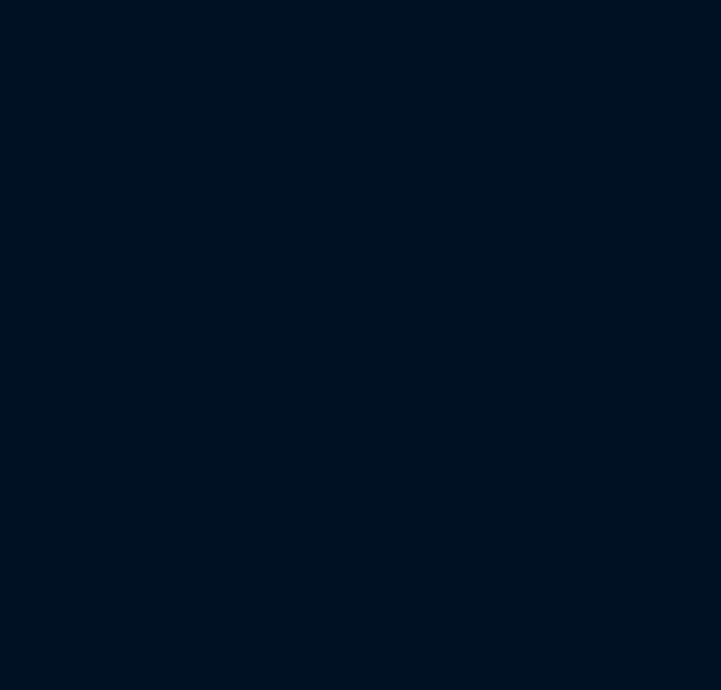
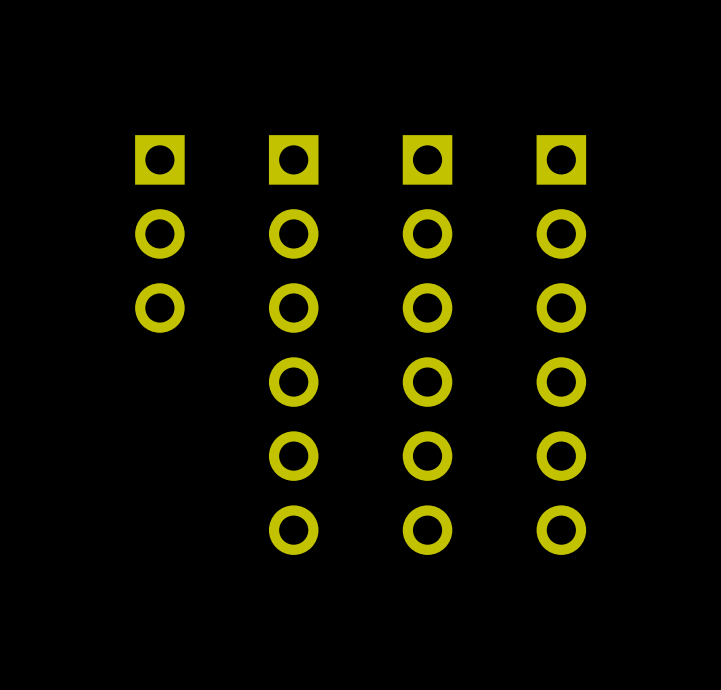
part: none -> (159, 233)
part: none -> (293, 345)
part: none -> (427, 345)
part: none -> (561, 345)

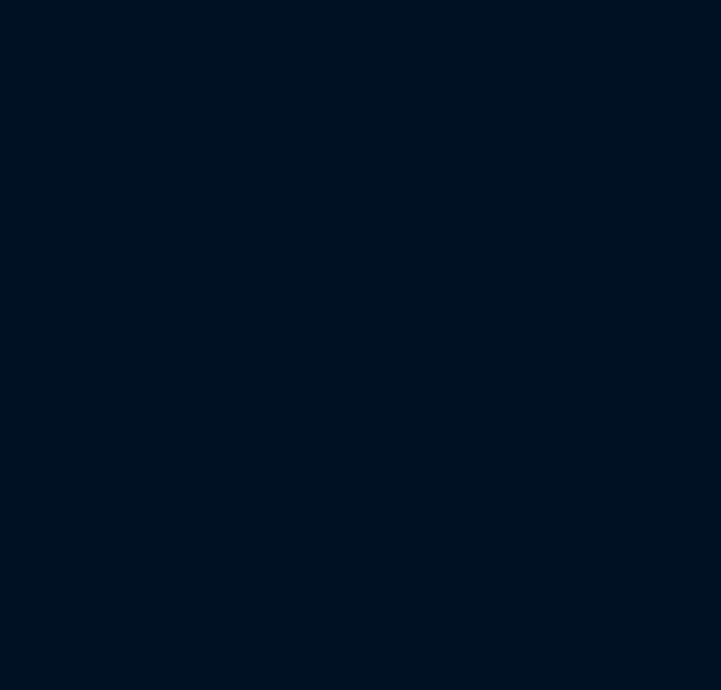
part: (159, 233) -> none
part: (293, 345) -> none
part: (427, 345) -> none
part: (561, 345) -> none

